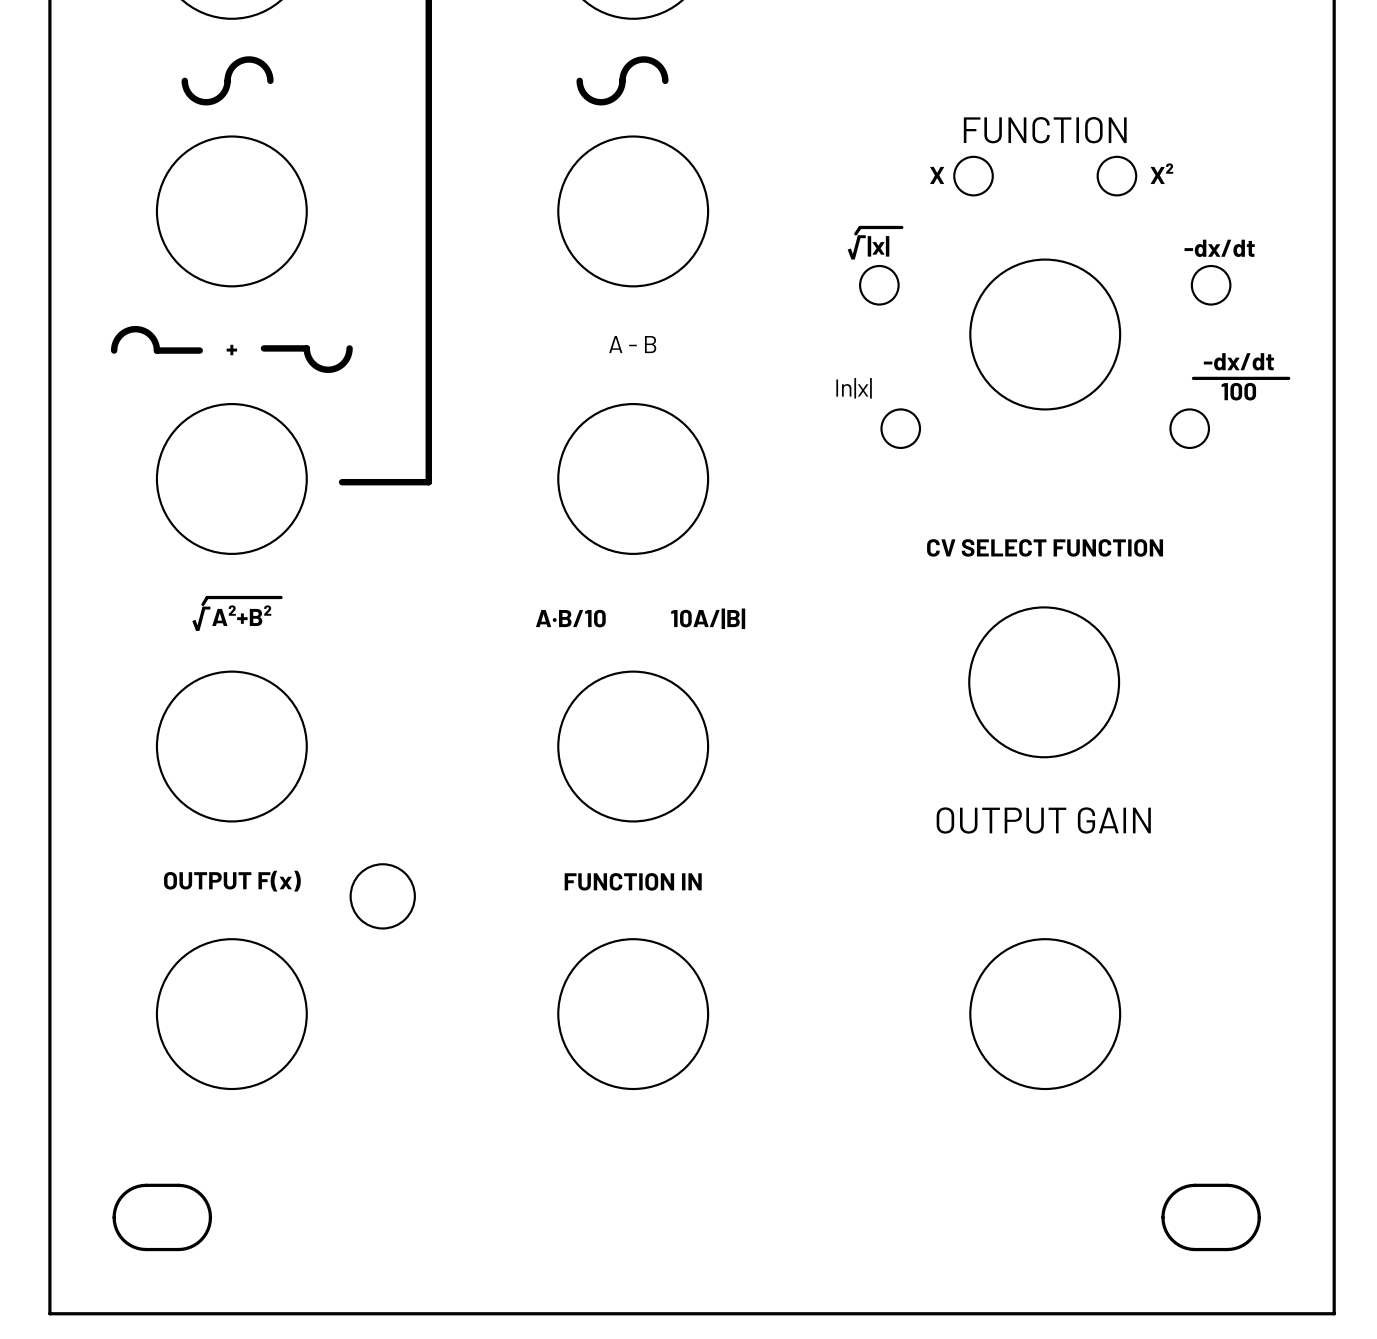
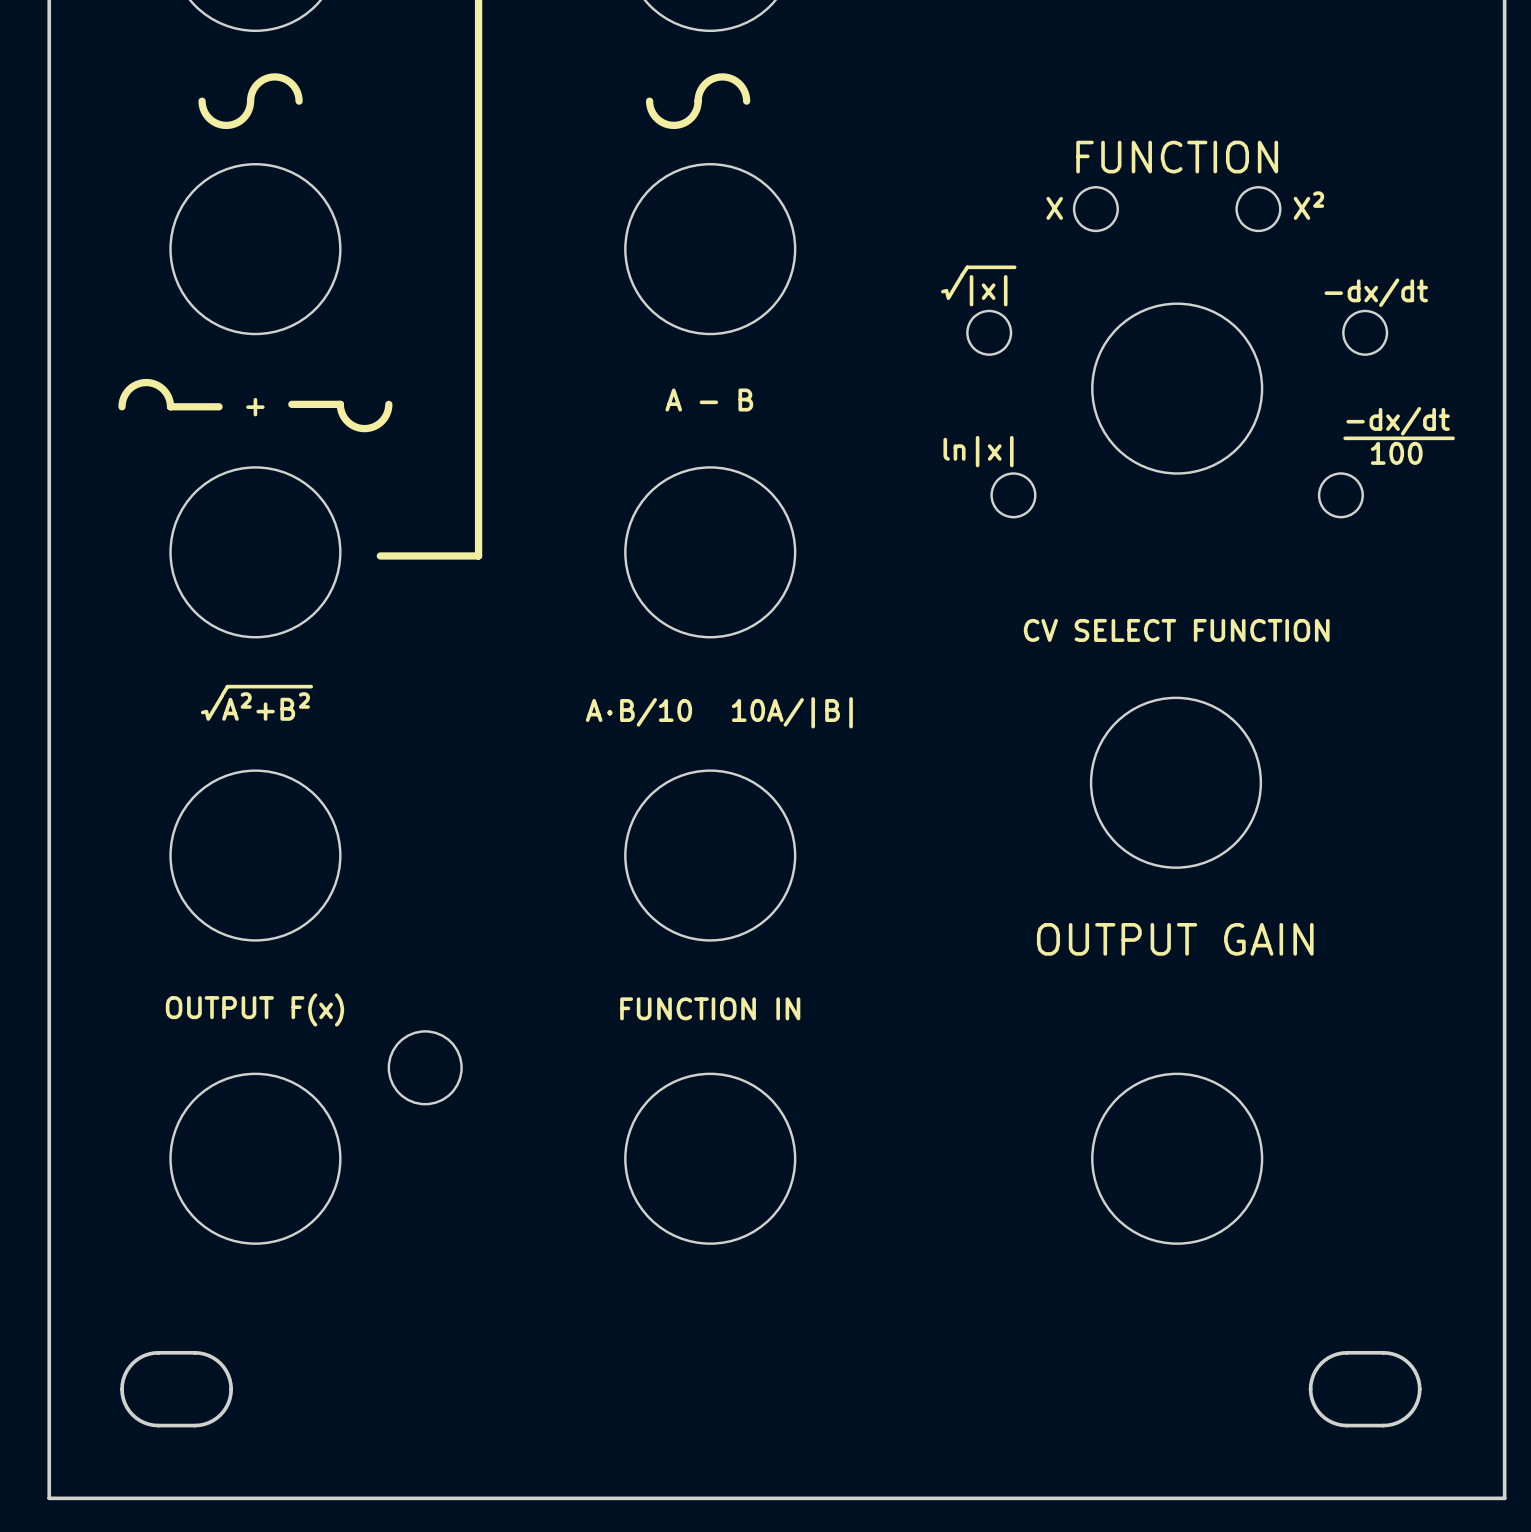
round board edge position: (382, 896) -> (425, 1067)

